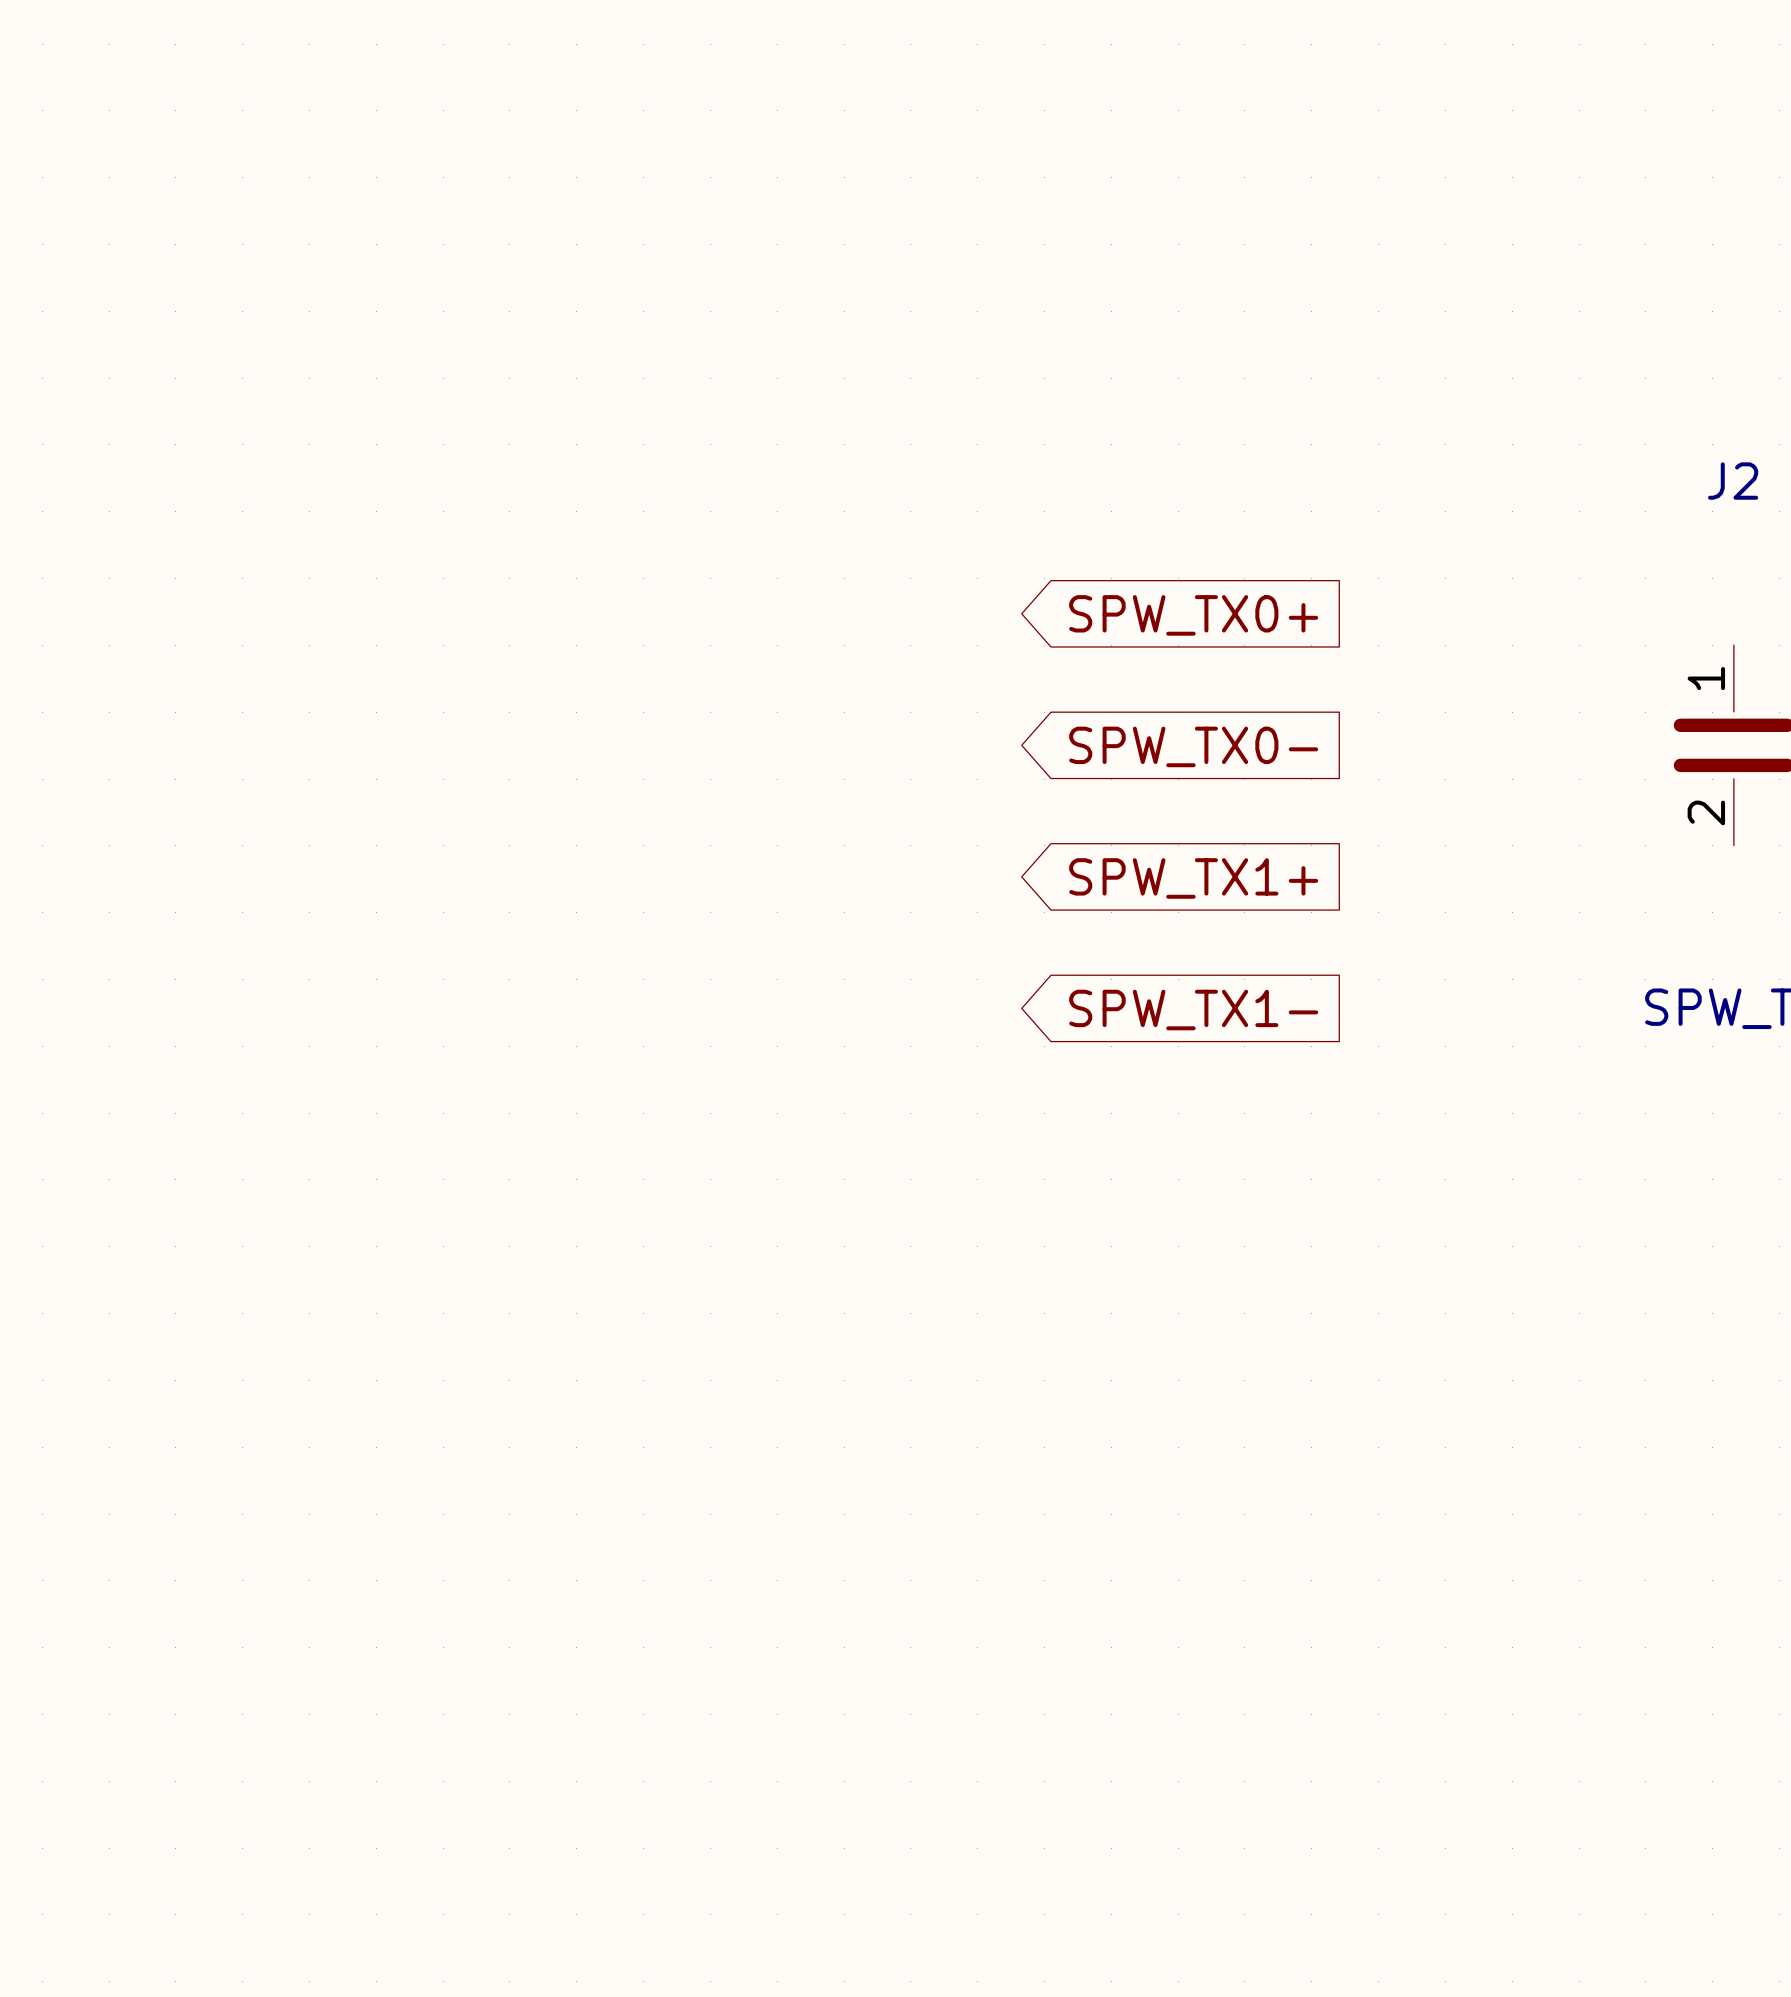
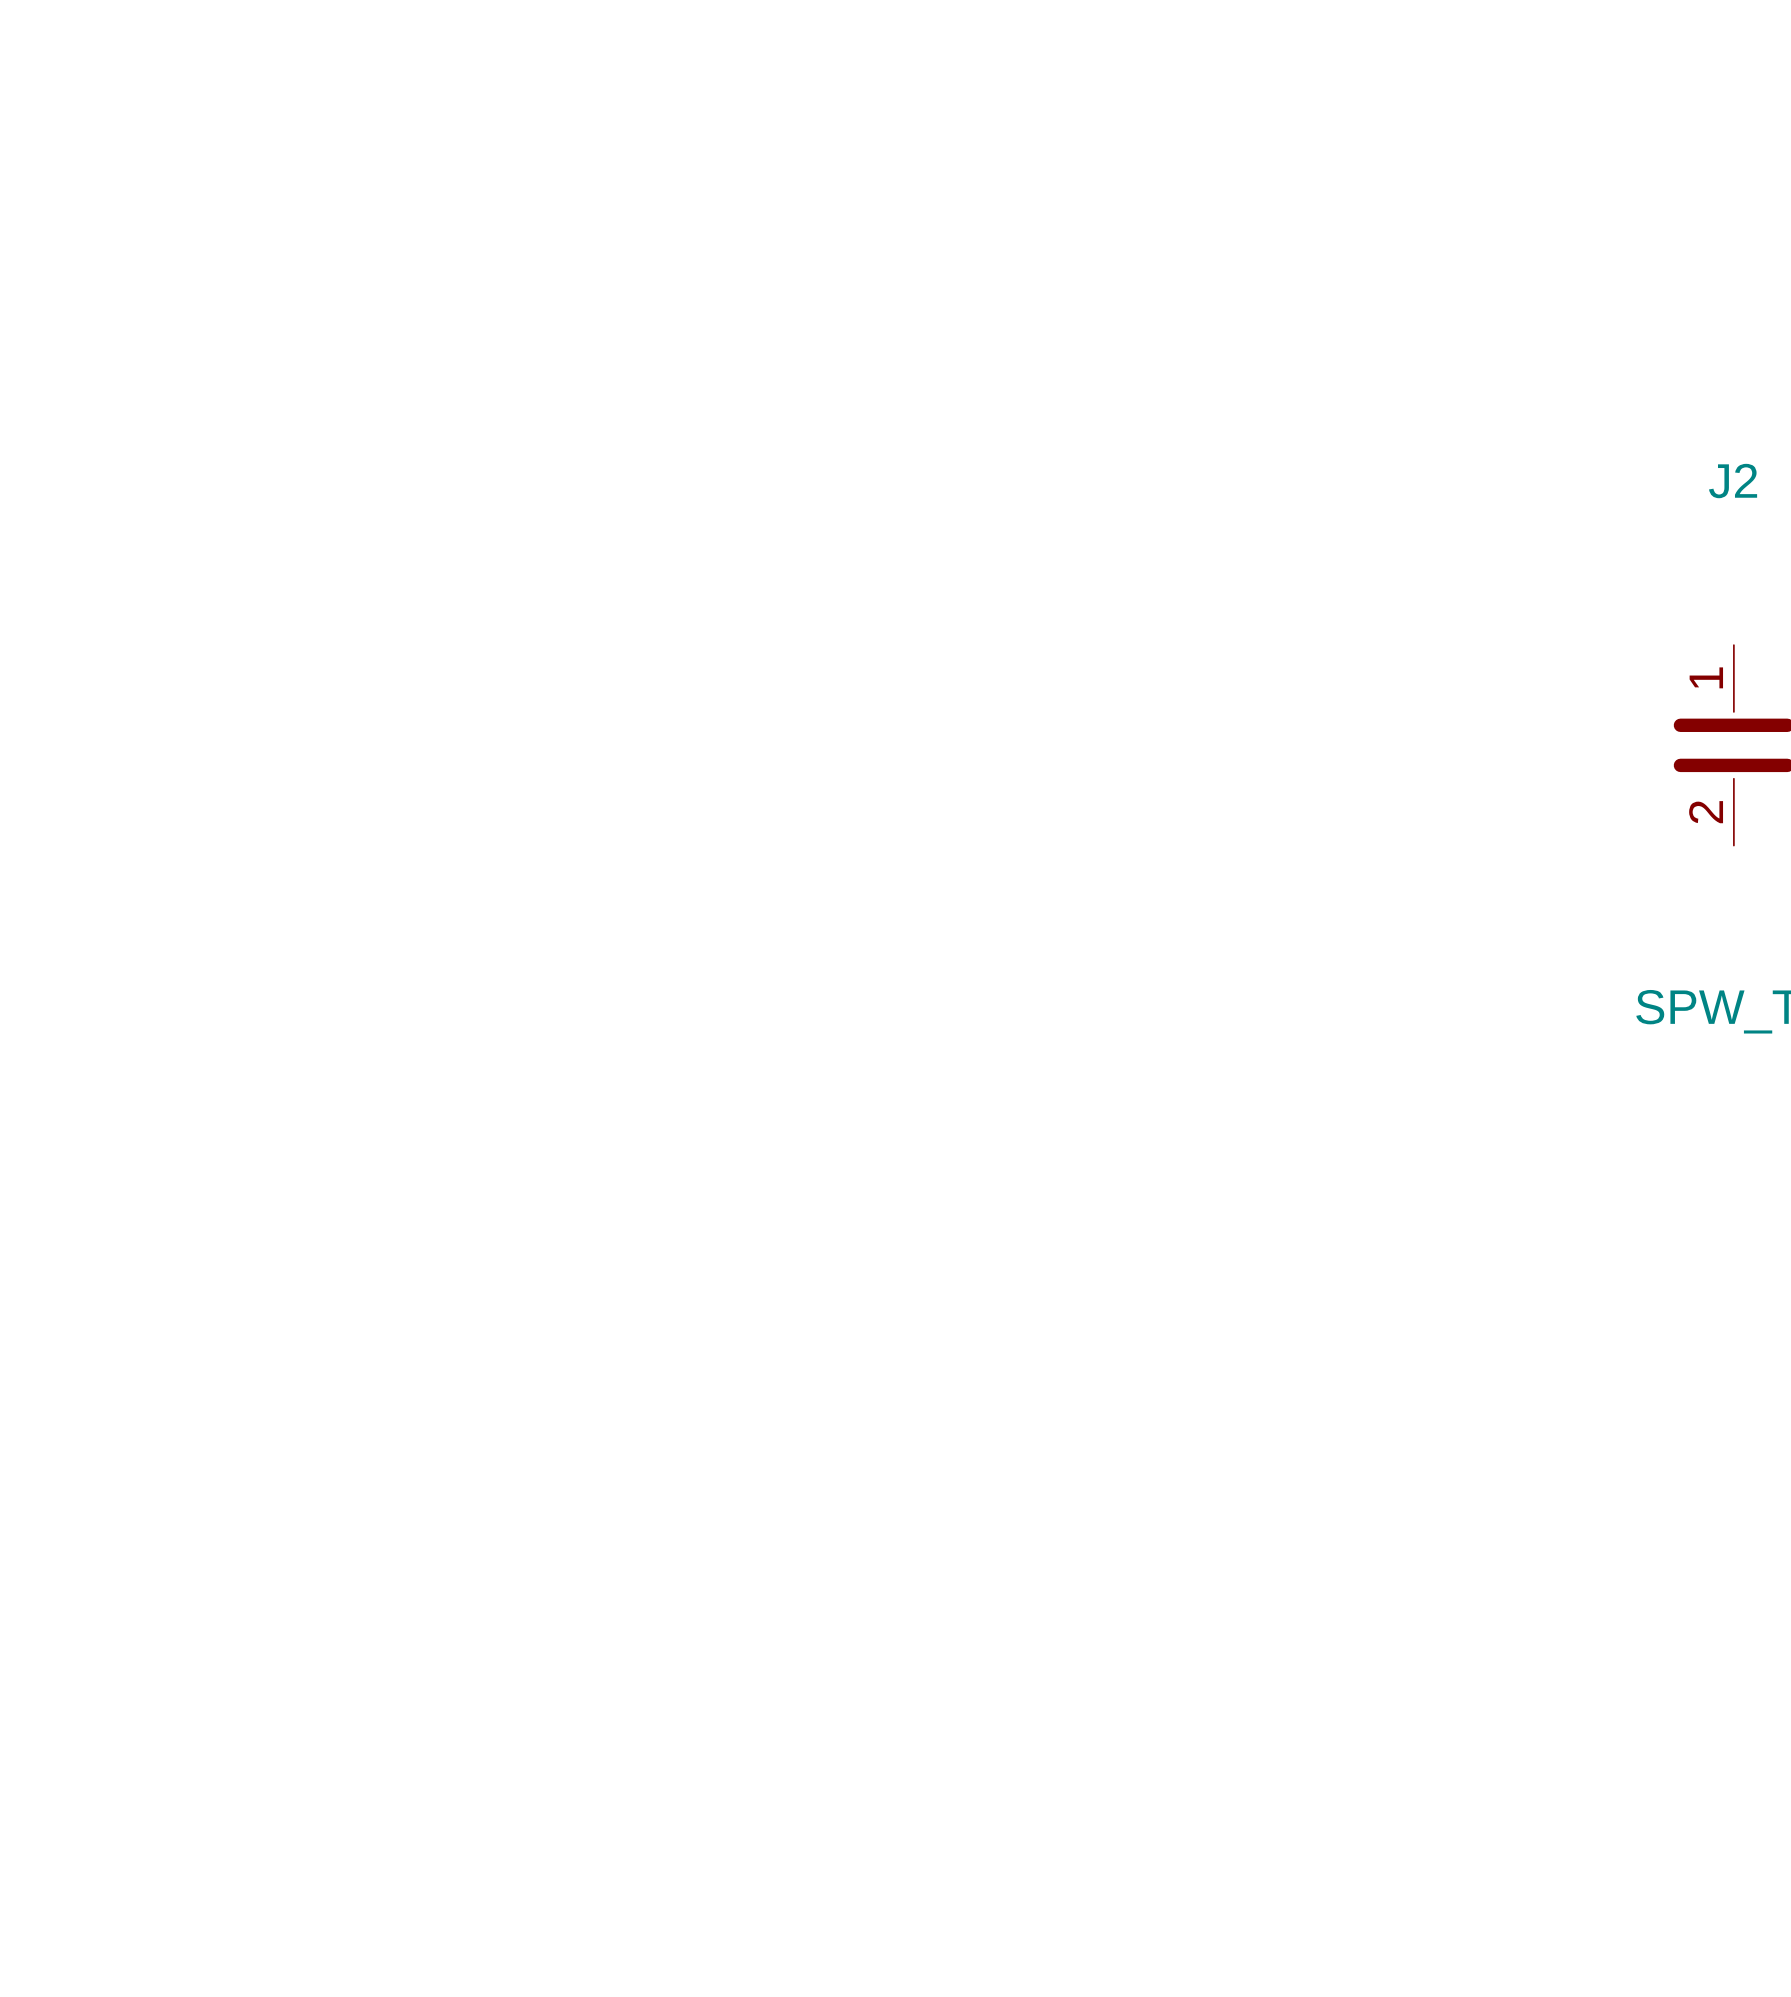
global label: SPW_TX0+ (1193, 615) -> none
global label: SPW_TX0- (1193, 746) -> none
global label: SPW_TX1+ (1193, 878) -> none
global label: SPW_TX1- (1193, 1010) -> none

